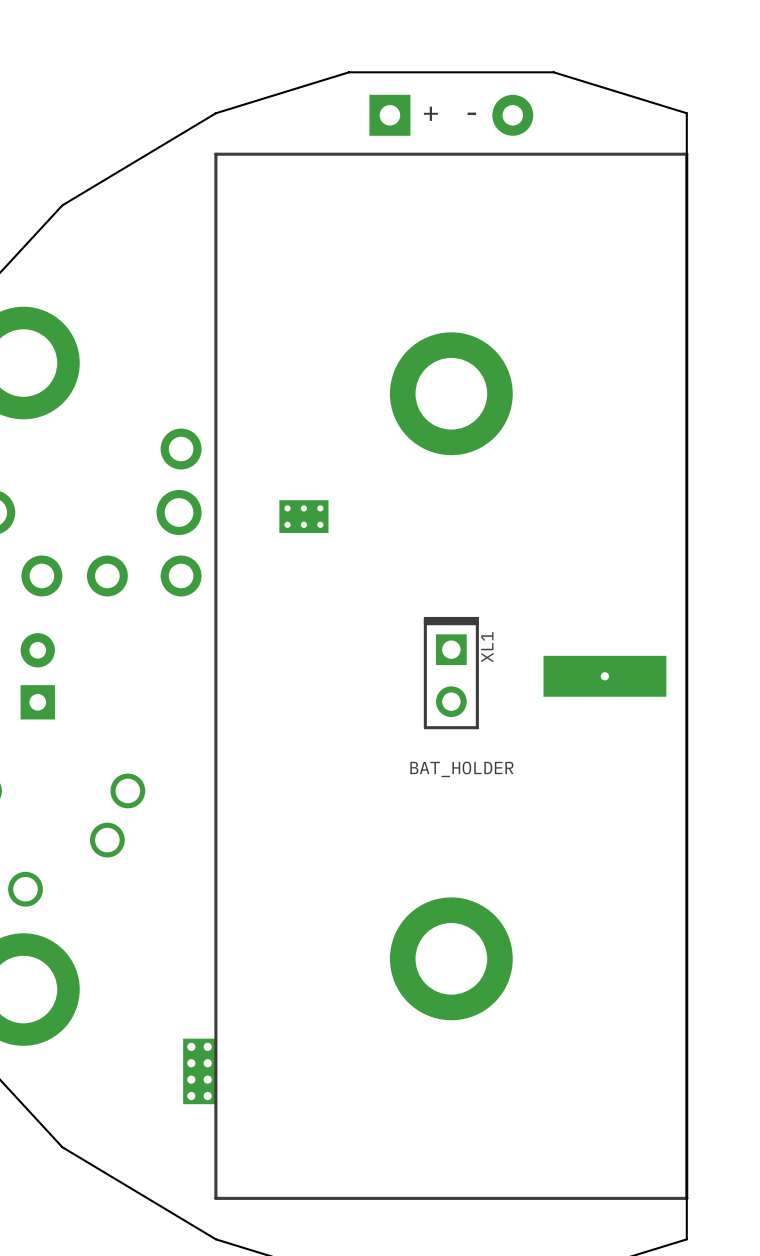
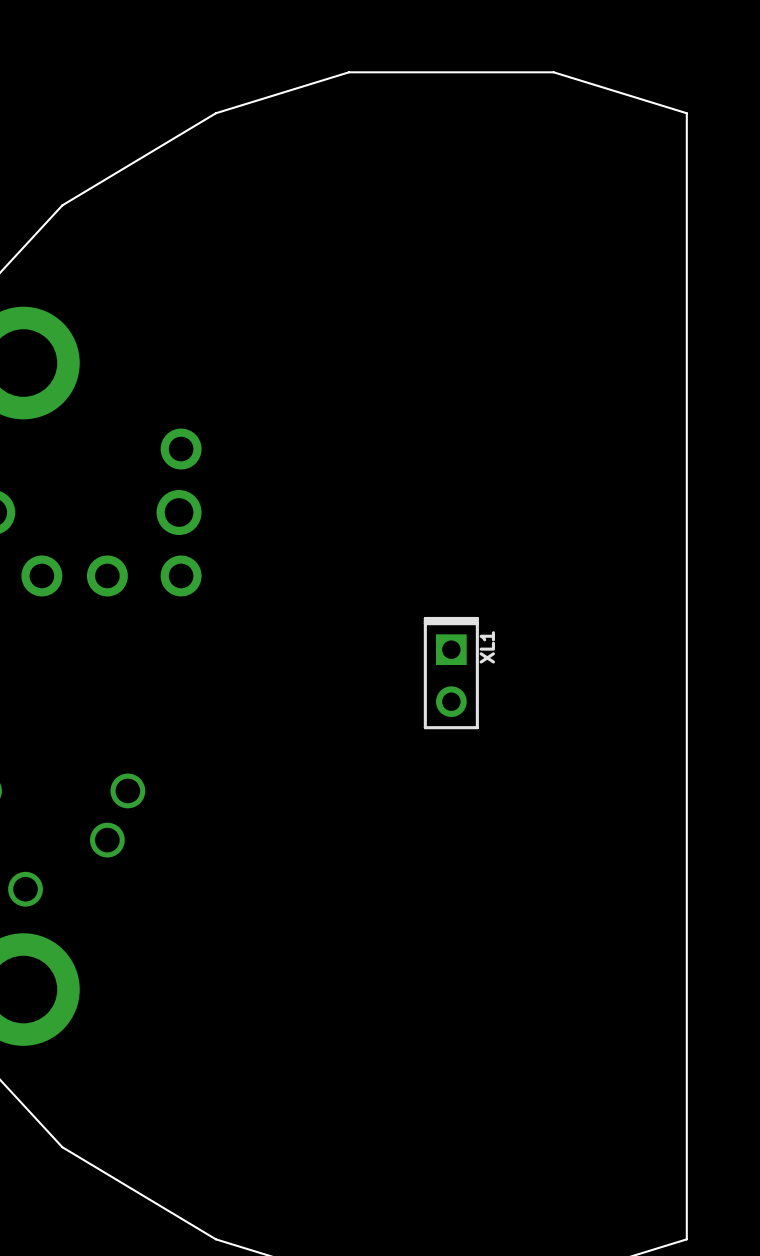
part: (303, 516) -> none
part: BAT_HOLDER (451, 647) -> none
part: (37, 676) -> none
part: (604, 676) -> none
part: (199, 1071) -> none

